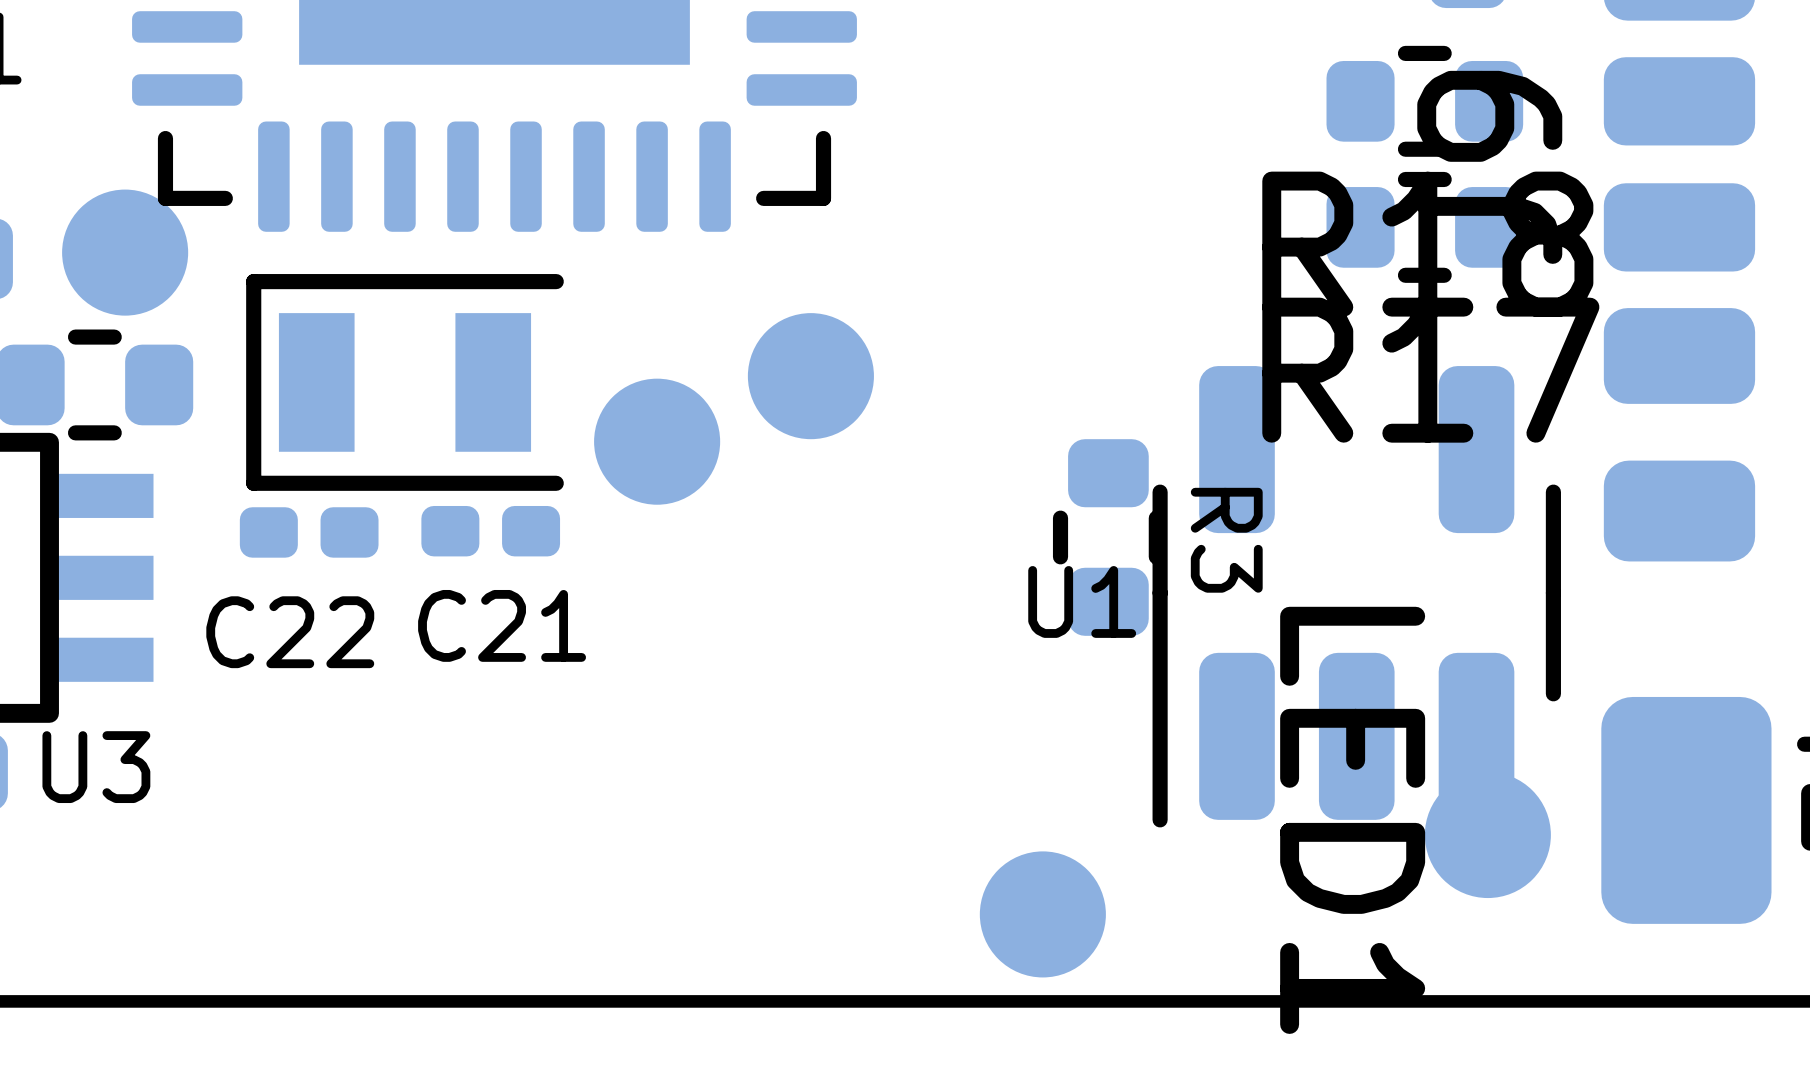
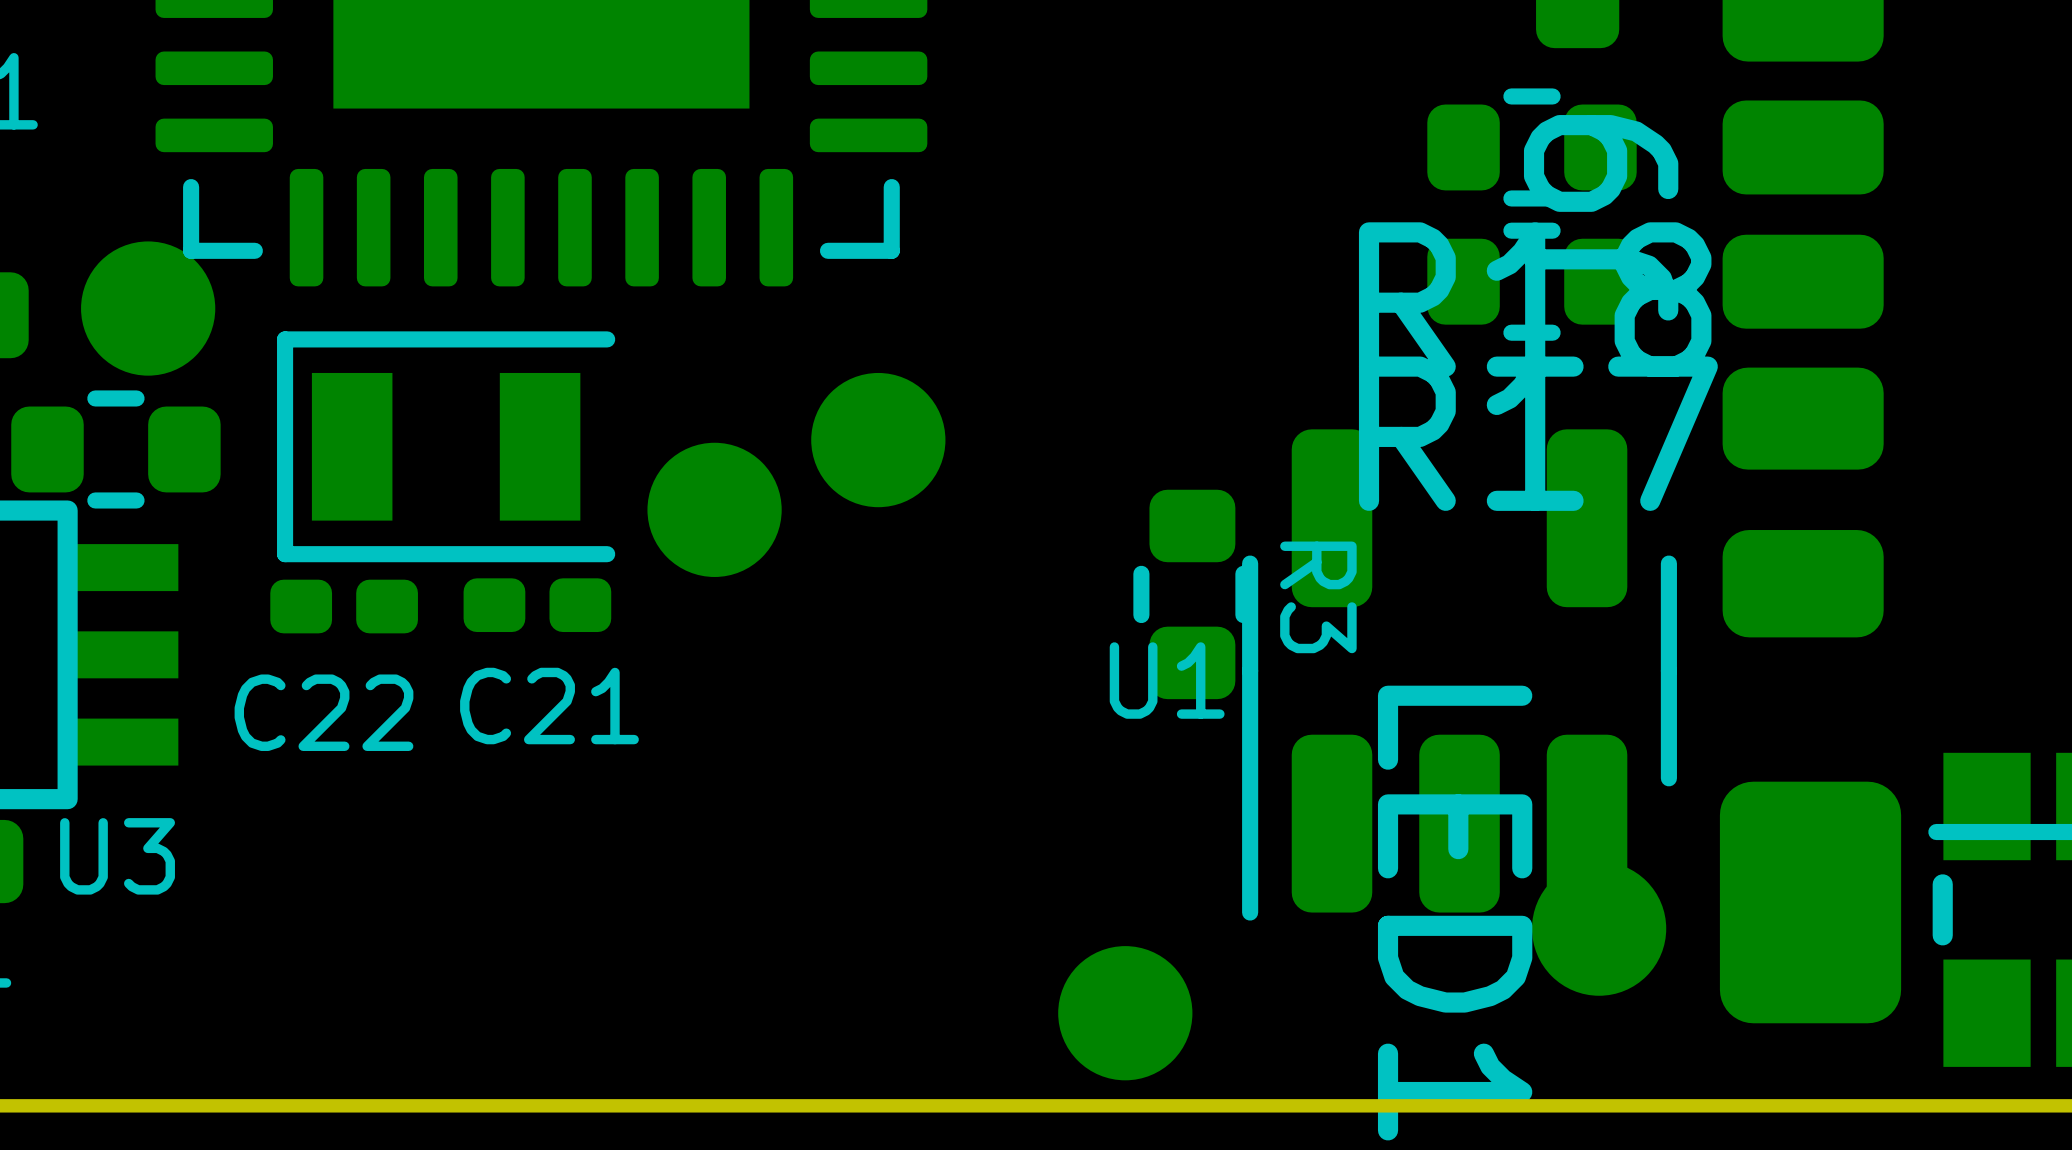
R3 position: (1108, 537) -> (1192, 594)

